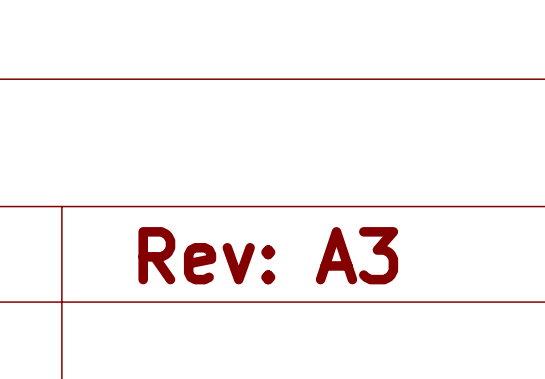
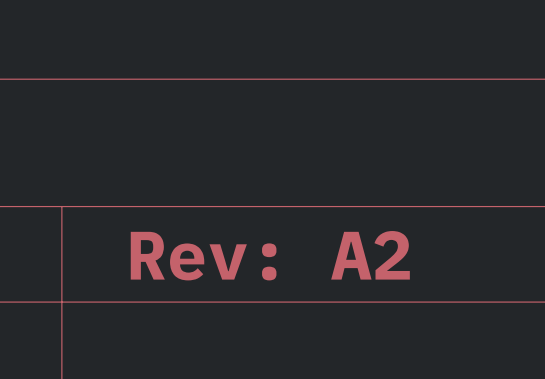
title block: Rev: A3 (268, 255) -> Rev: A2 (270, 255)

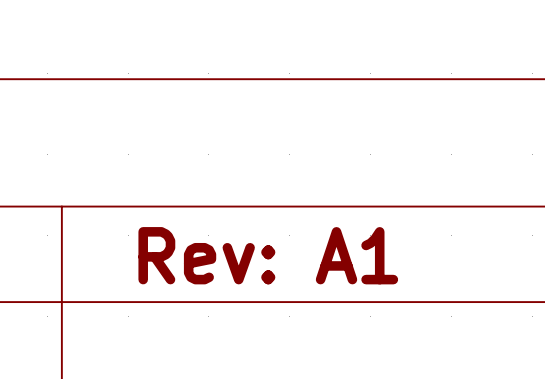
title block: Rev: A2 (270, 255) -> Rev: A1 (268, 255)

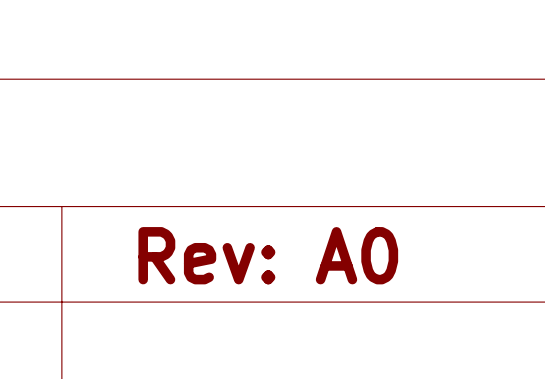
title block: Rev: A1 (268, 255) -> Rev: A0 (268, 255)

